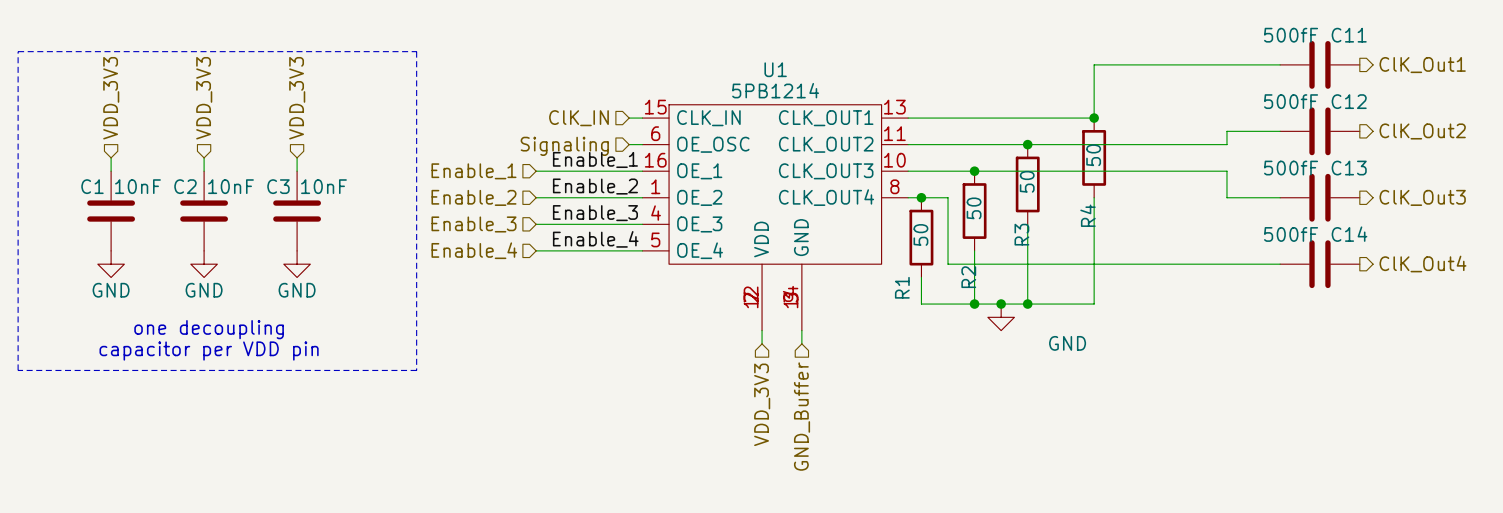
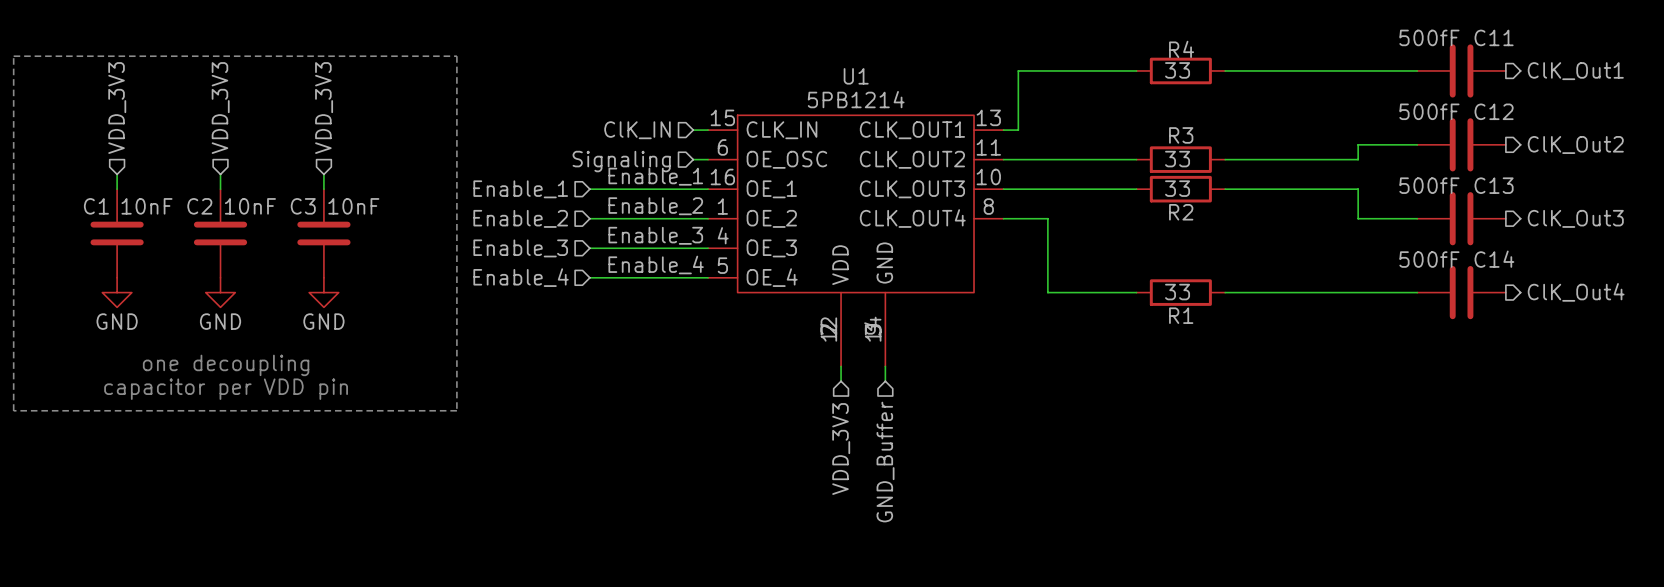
wire: (1107, 64) (1094, 64) (1094, 118) (921, 118) -> (1136, 70) (1018, 70) (1018, 130)
junction: (1094, 118) -> none
wire: (1027, 144) (1107, 144) -> none
junction: (1027, 144) -> none
R4 value: 50 (1093, 155) -> 33 (1177, 70)
R4 rotation: 0° (1094, 157) -> 90° clockwise (1180, 70)
R4 position: (1094, 157) -> (1180, 70)
junction: (974, 171) -> none
wire: (1027, 171) (1107, 171) -> none
R3 value: 50 (1027, 181) -> 33 (1177, 159)
R3 rotation: 0° (1027, 184) -> 90° clockwise (1180, 159)
R3 position: (1027, 184) -> (1180, 159)
junction: (921, 197) -> none
wire: (1094, 197) (1094, 304) (921, 304) (921, 277) -> none
R2 value: 50 (974, 208) -> 33 (1177, 188)
R2 rotation: 0° (974, 211) -> 90° clockwise (1180, 189)
R2 position: (974, 211) -> (1180, 189)
R4 name position: R4 (1088, 215) -> R4 (1181, 49)
wire: (1027, 224) (1027, 304) -> none
R1 value: 50 (920, 234) -> 33 (1177, 292)
R3 name position: R3 (1021, 234) -> R3 (1181, 135)
R1 rotation: 0° (921, 237) -> 90° clockwise (1180, 292)
R1 position: (921, 237) -> (1180, 292)
wire: (974, 250) (974, 304) -> none
wire: (1027, 264) (1107, 264) -> none
R2 name position: R2 (968, 277) -> R2 (1181, 212)
R1 name position: R1 (902, 287) -> R1 (1181, 315)
junction: (974, 304) -> none
junction: (1001, 304) -> none
junction: (1027, 304) -> none
power symbol: GND (1001, 317) -> none

